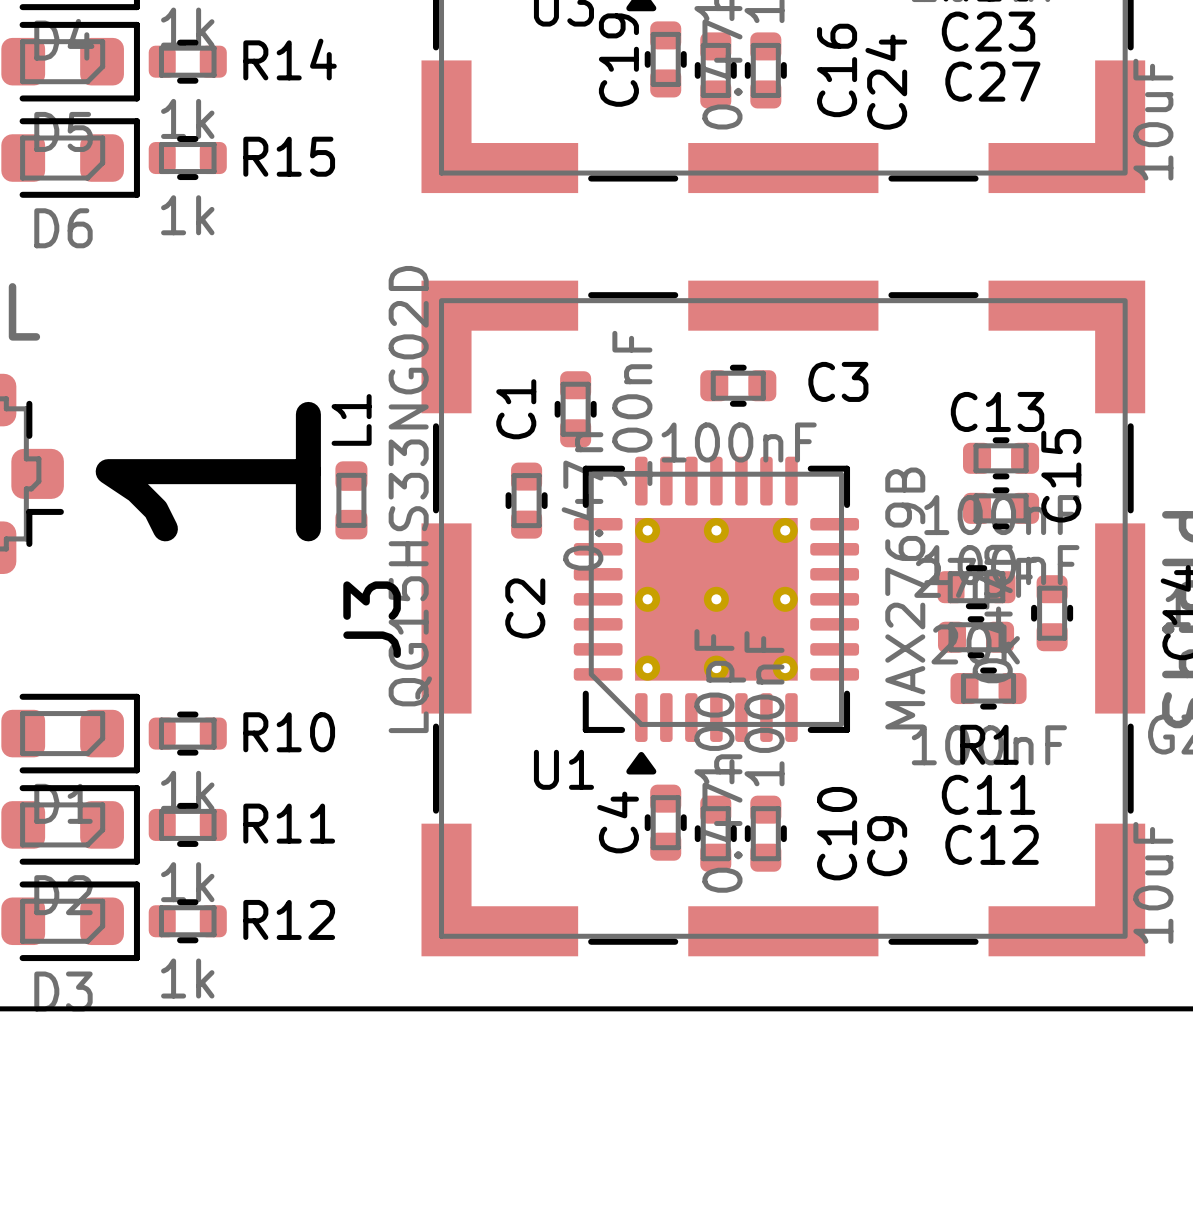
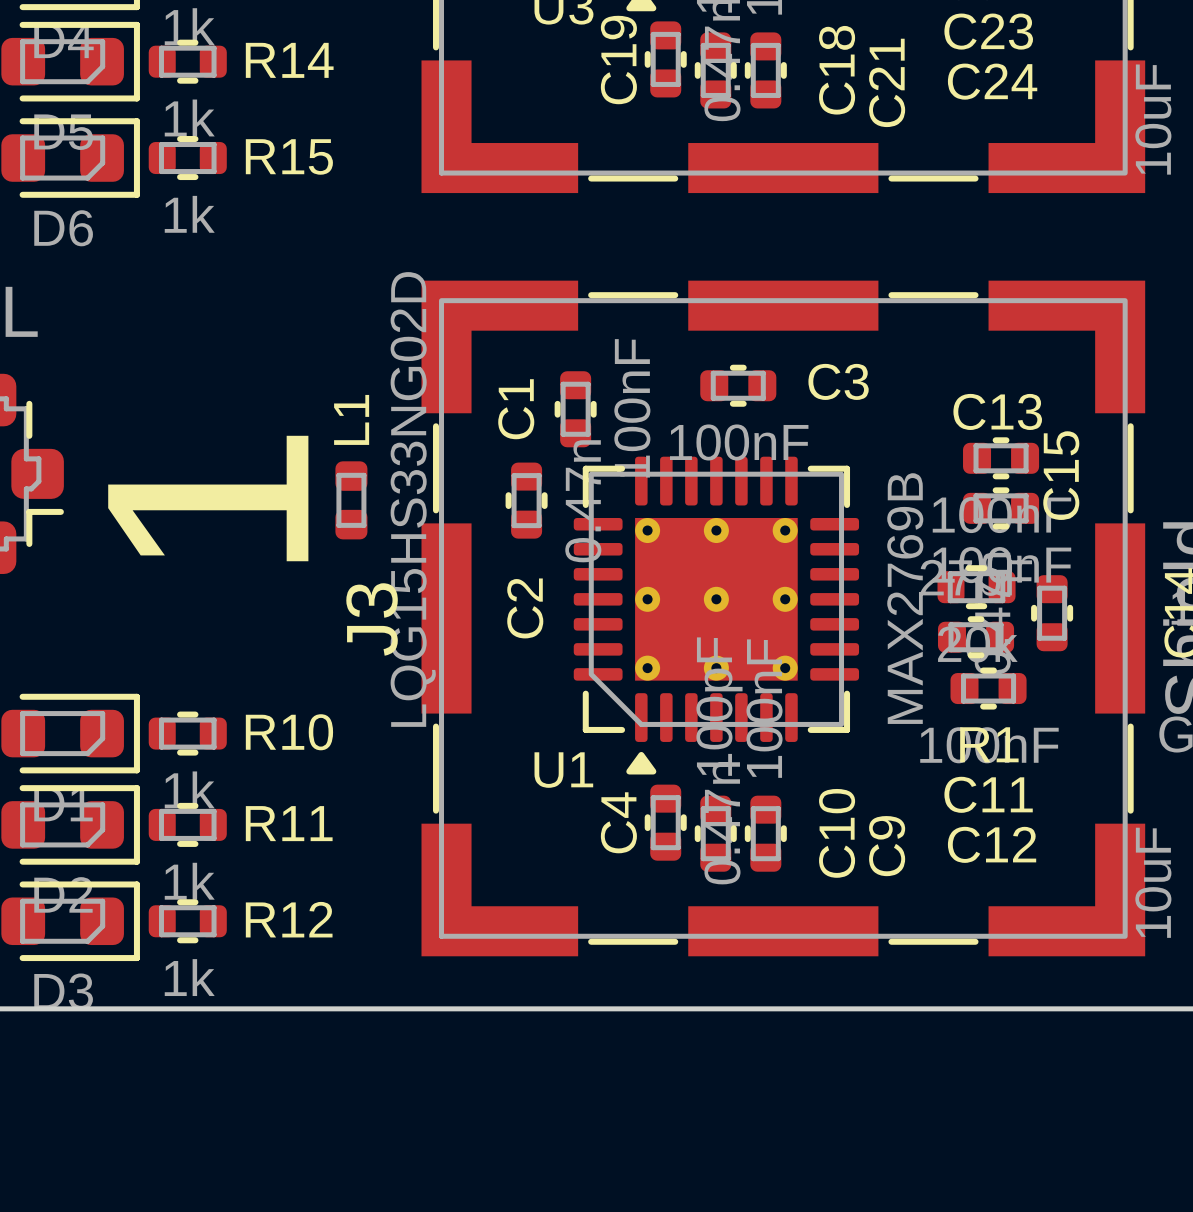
C16 name: C16 (837, 70) -> C18 (837, 70)
C27 name: C27 (992, 81) -> C24 (992, 81)
C24 name: C24 (886, 82) -> C21 (887, 82)

